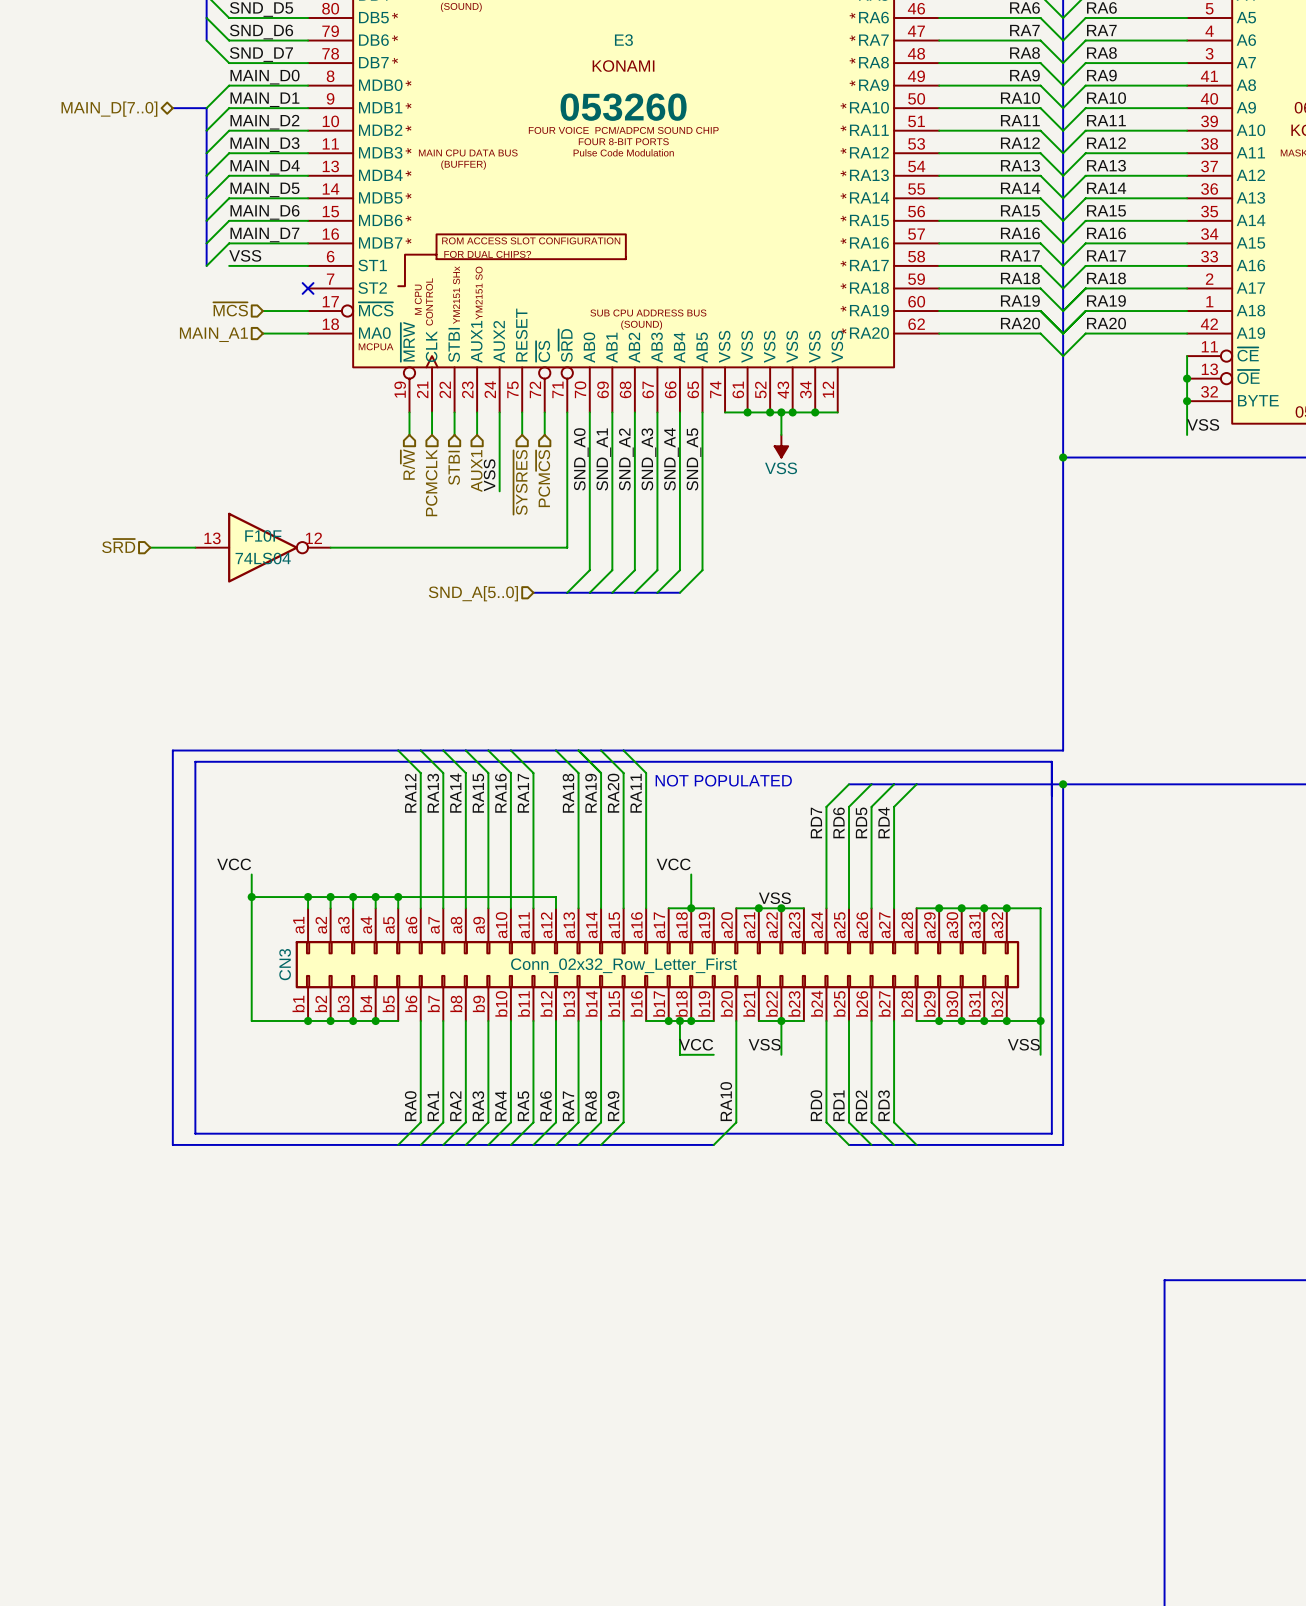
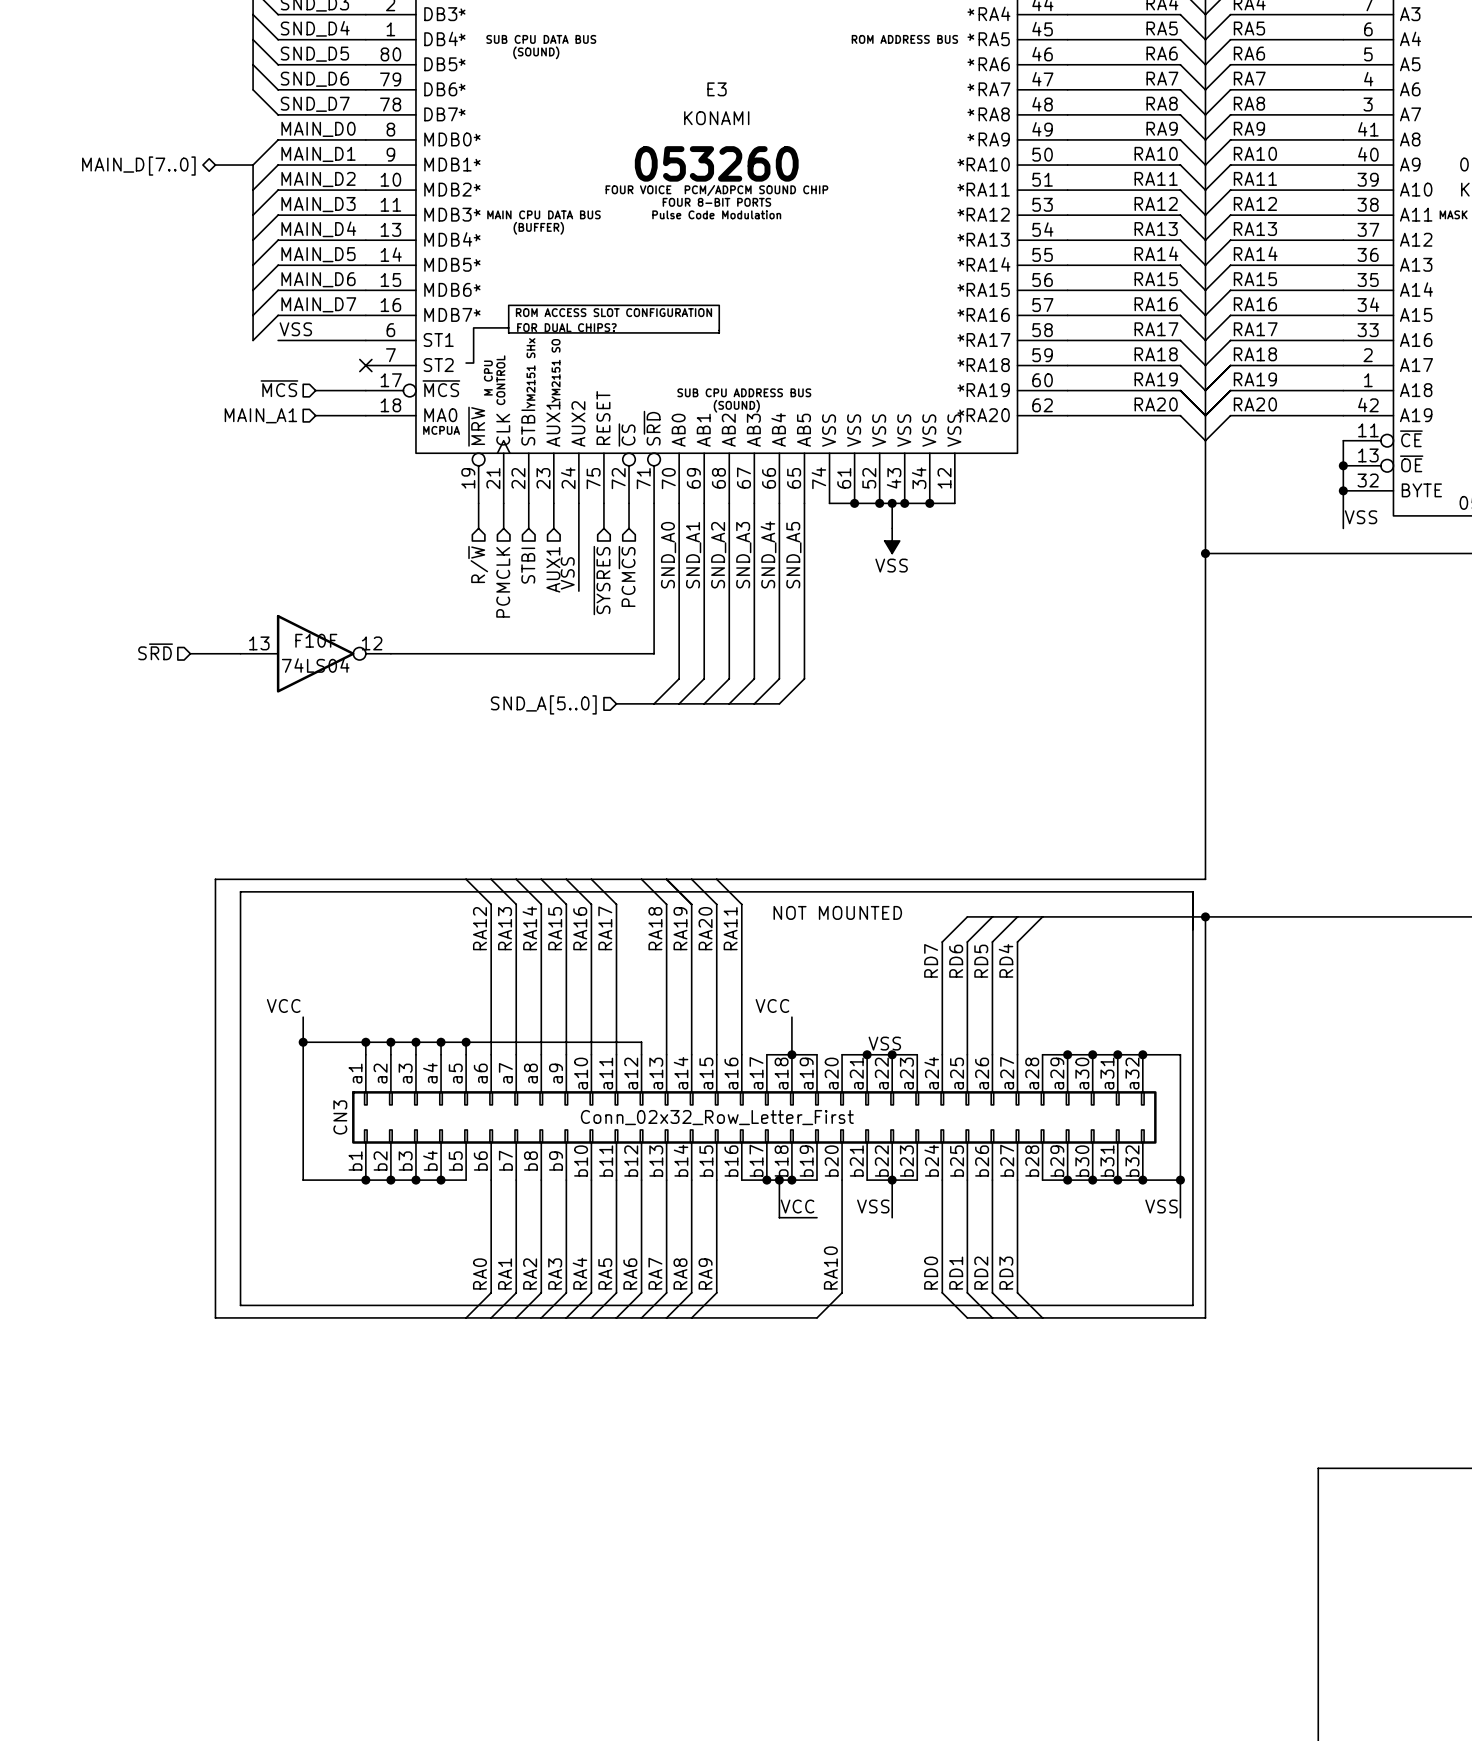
text: NOT POPULATED (723, 780) -> NOT MOUNTED (837, 912)

